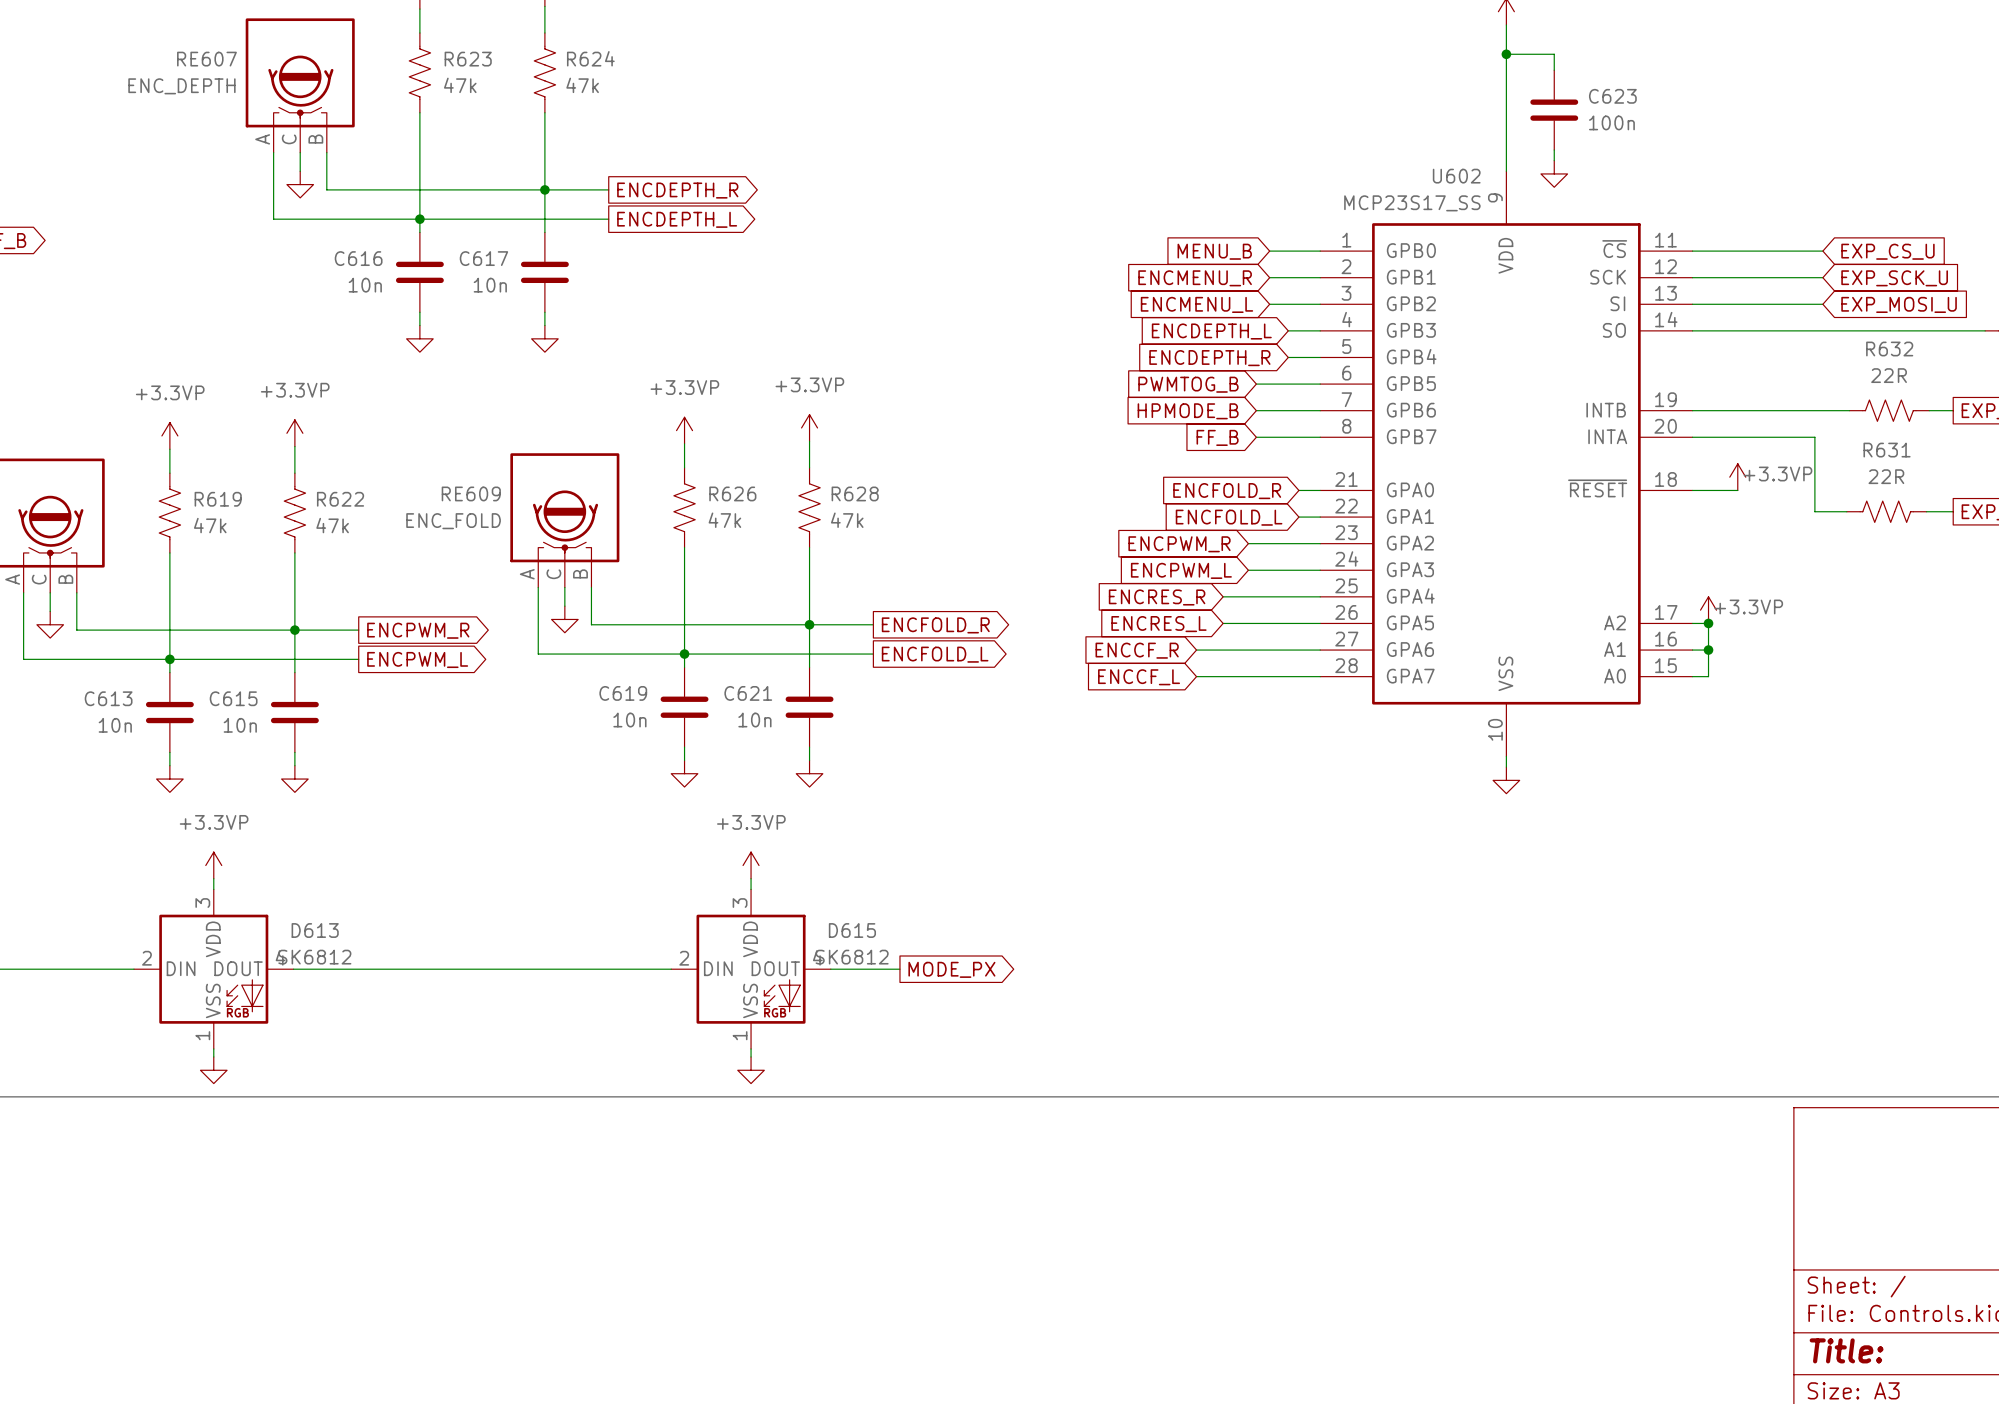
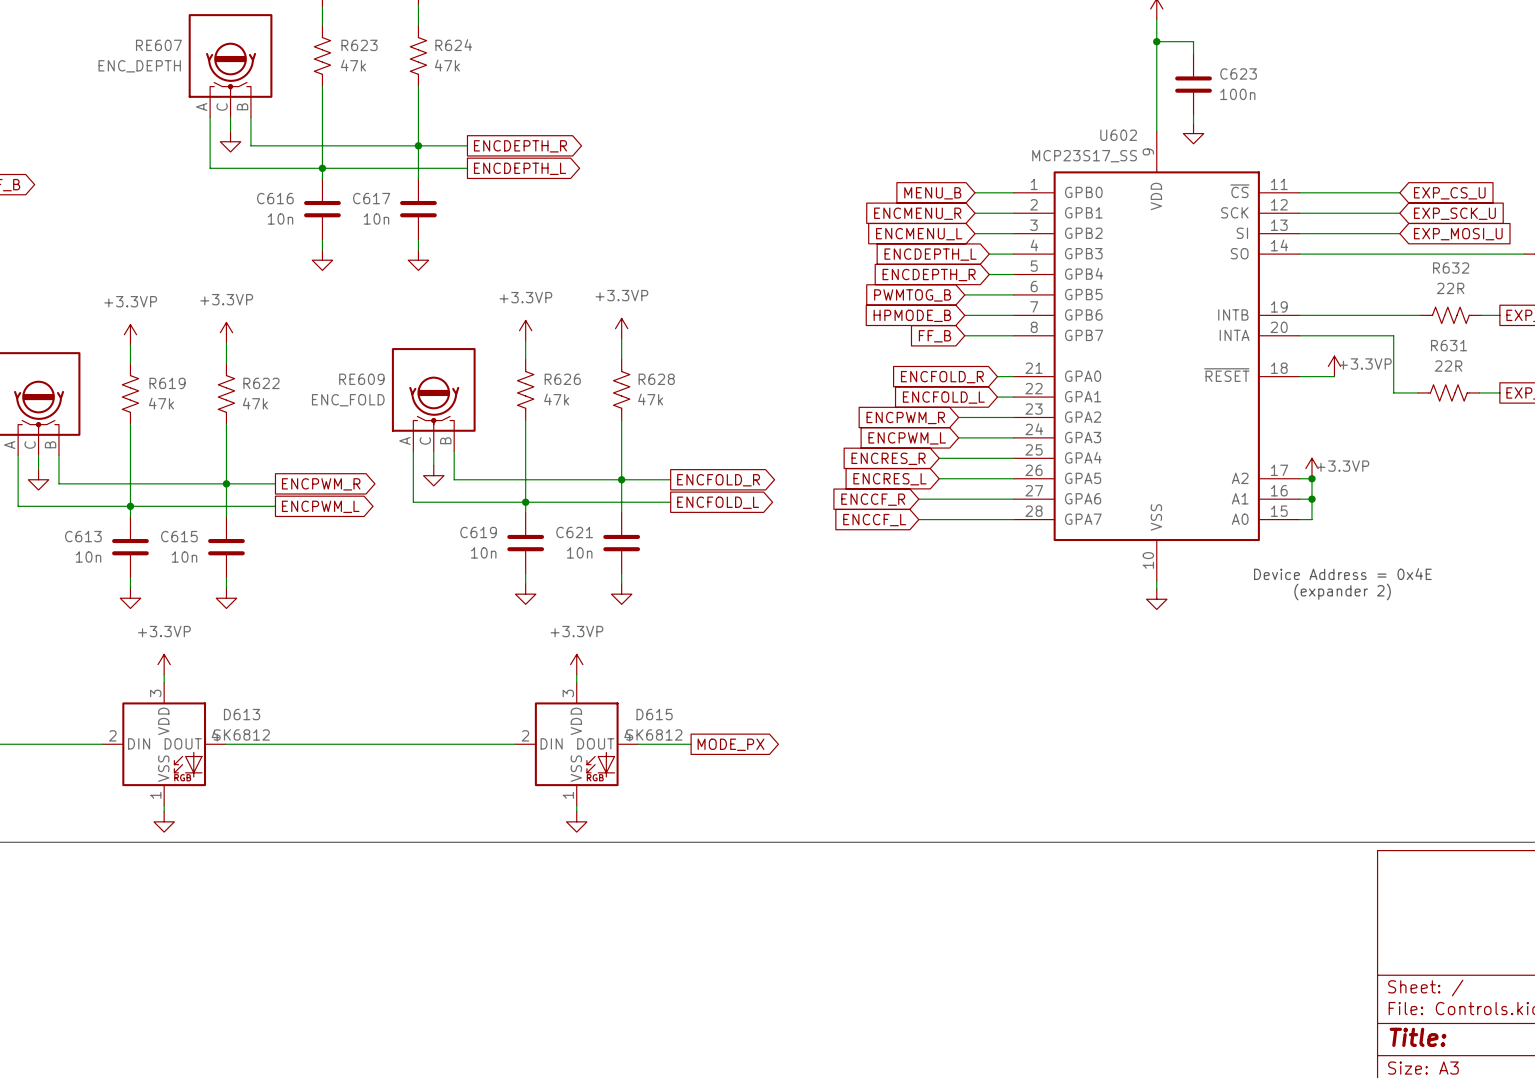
text: none -> Device Address = 0x4E (1342, 574)
text: none -> (expander 2) (1342, 592)

